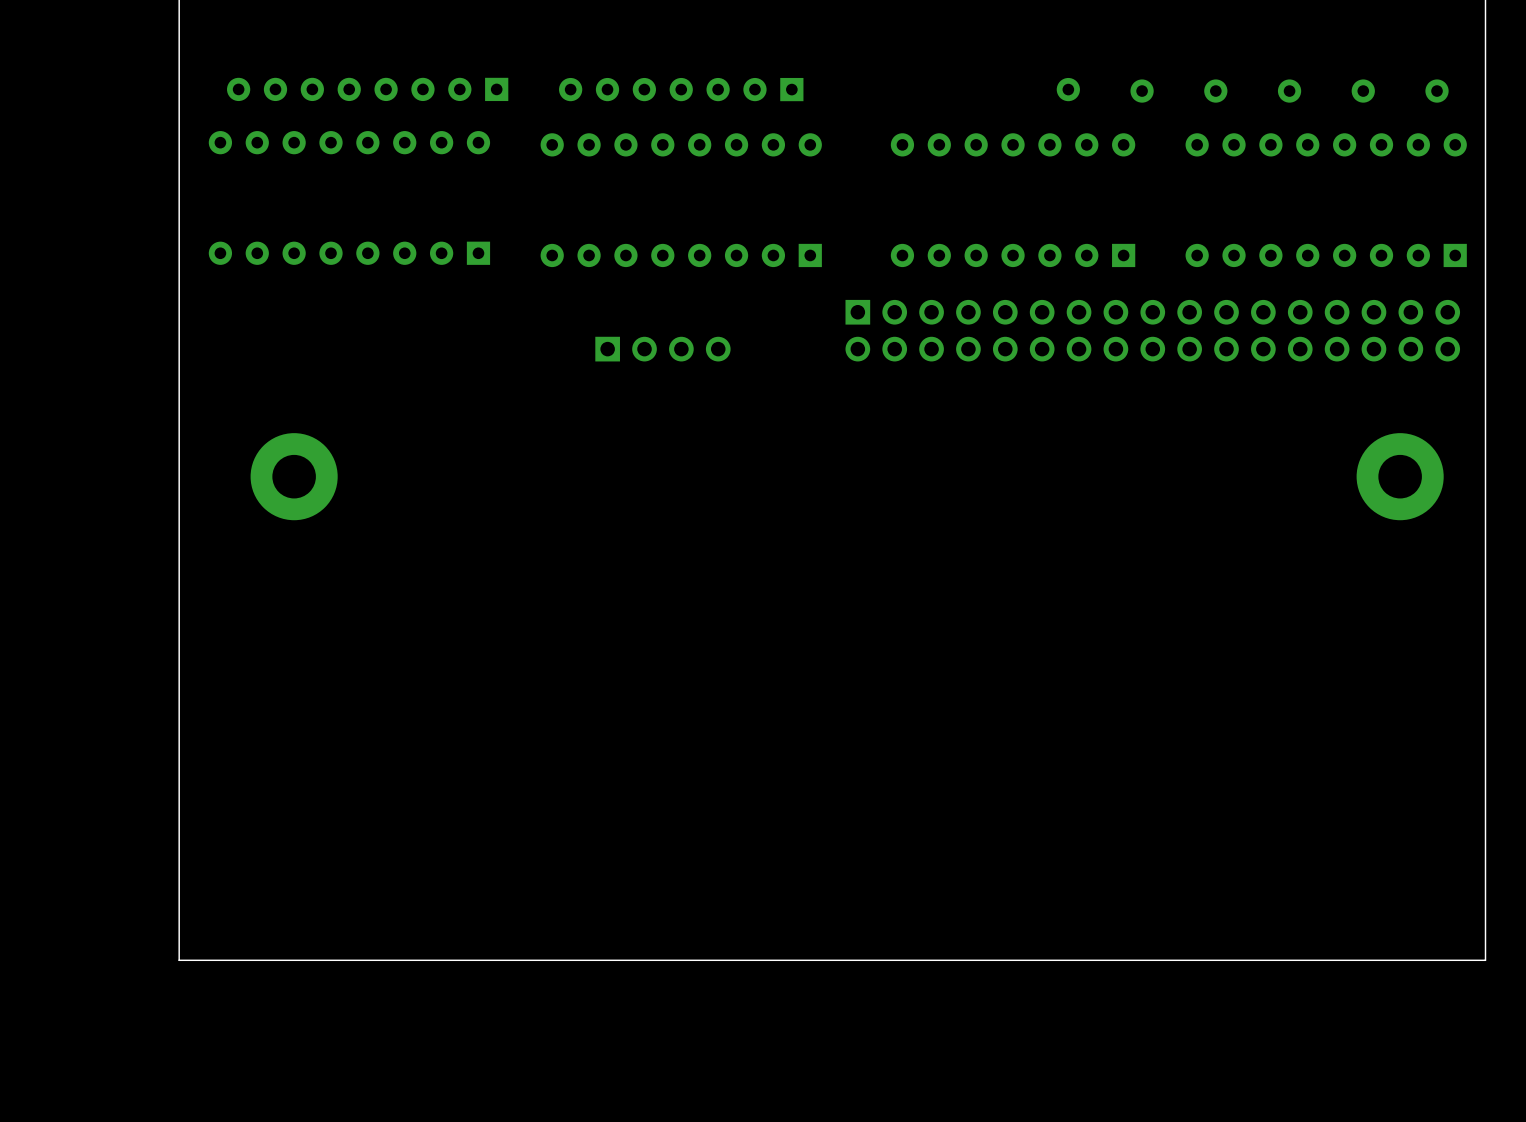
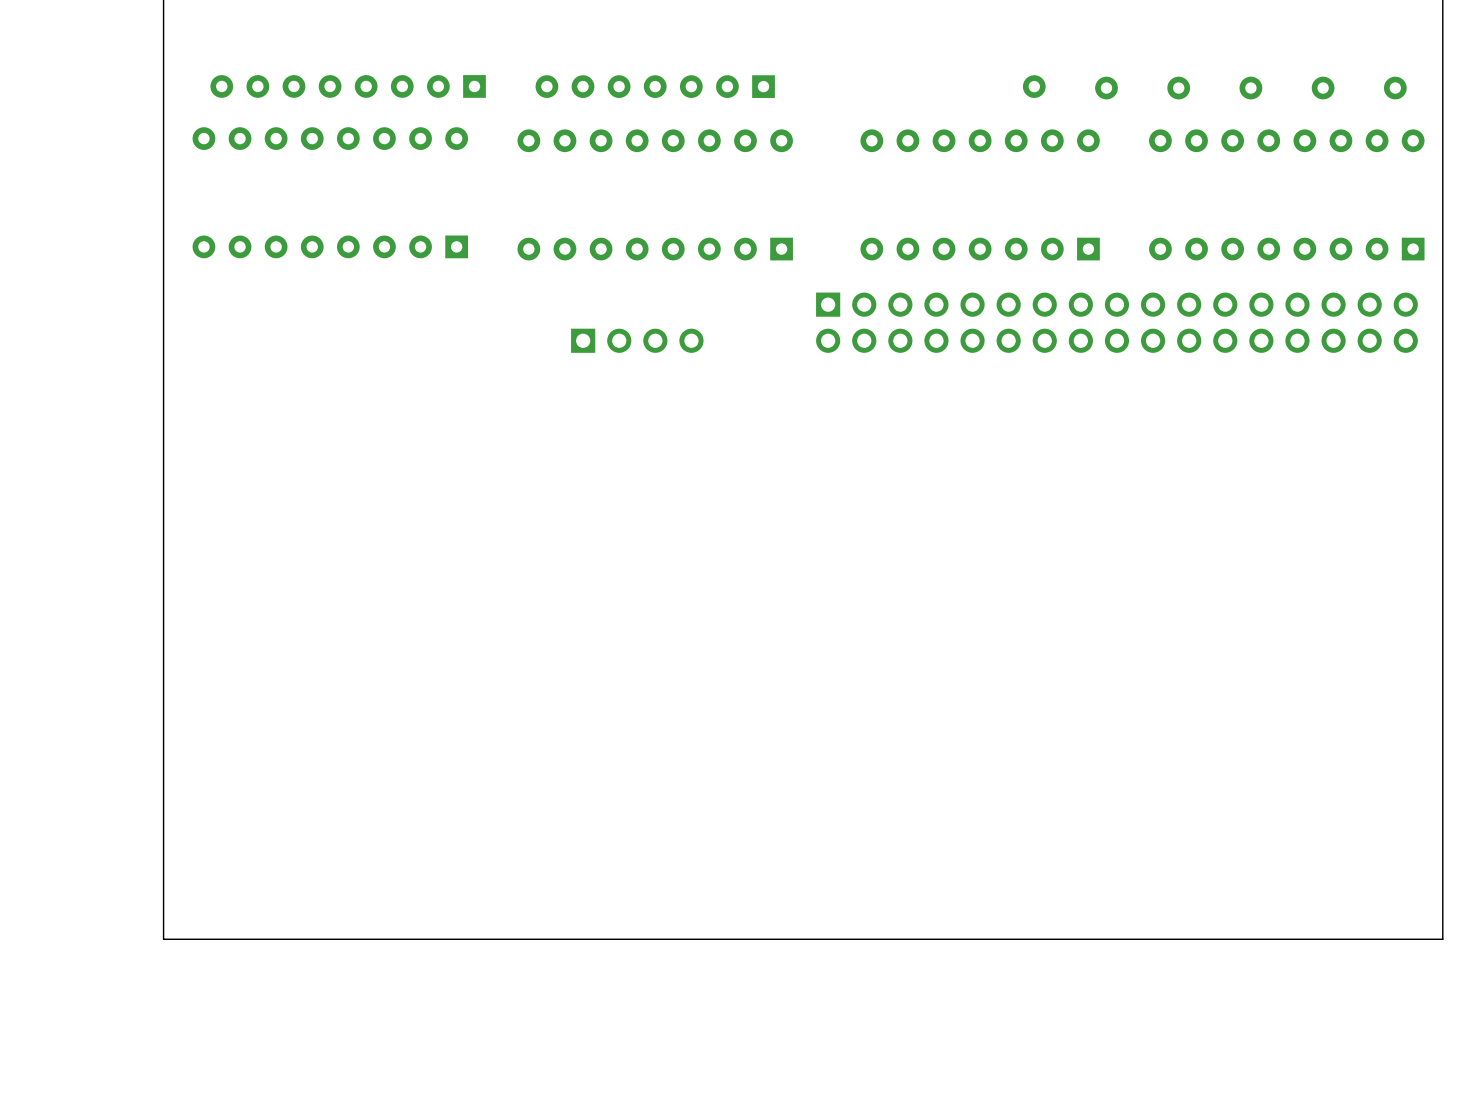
part: (294, 476) -> none
part: (1400, 476) -> none

